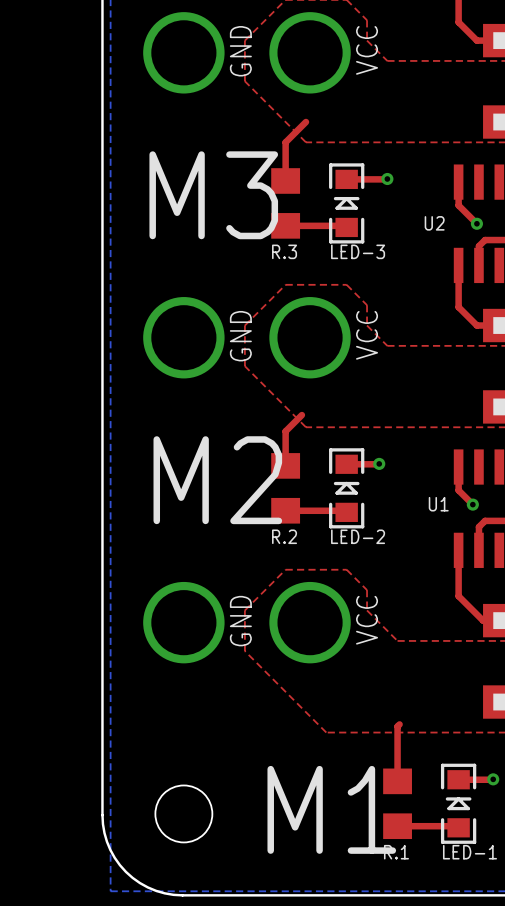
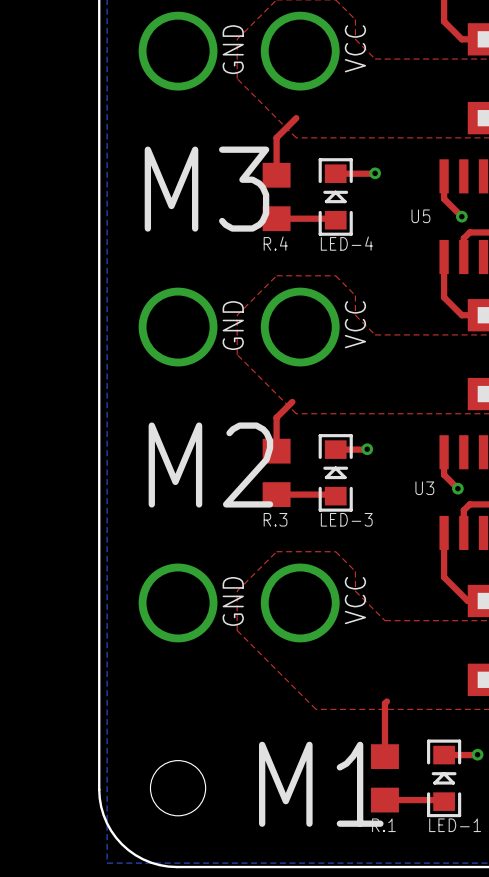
U2 name: U2 (434, 223) -> U5 (420, 216)
R.3 name: R.3 (284, 251) -> R.4 (275, 243)
LED-3 name: LED-3 (358, 251) -> LED-4 (347, 243)
U1 name: U1 (438, 504) -> U3 (424, 488)
R.2 name: R.2 (284, 536) -> R.3 (275, 519)
LED-2 name: LED-2 (358, 536) -> LED-3 (346, 519)

